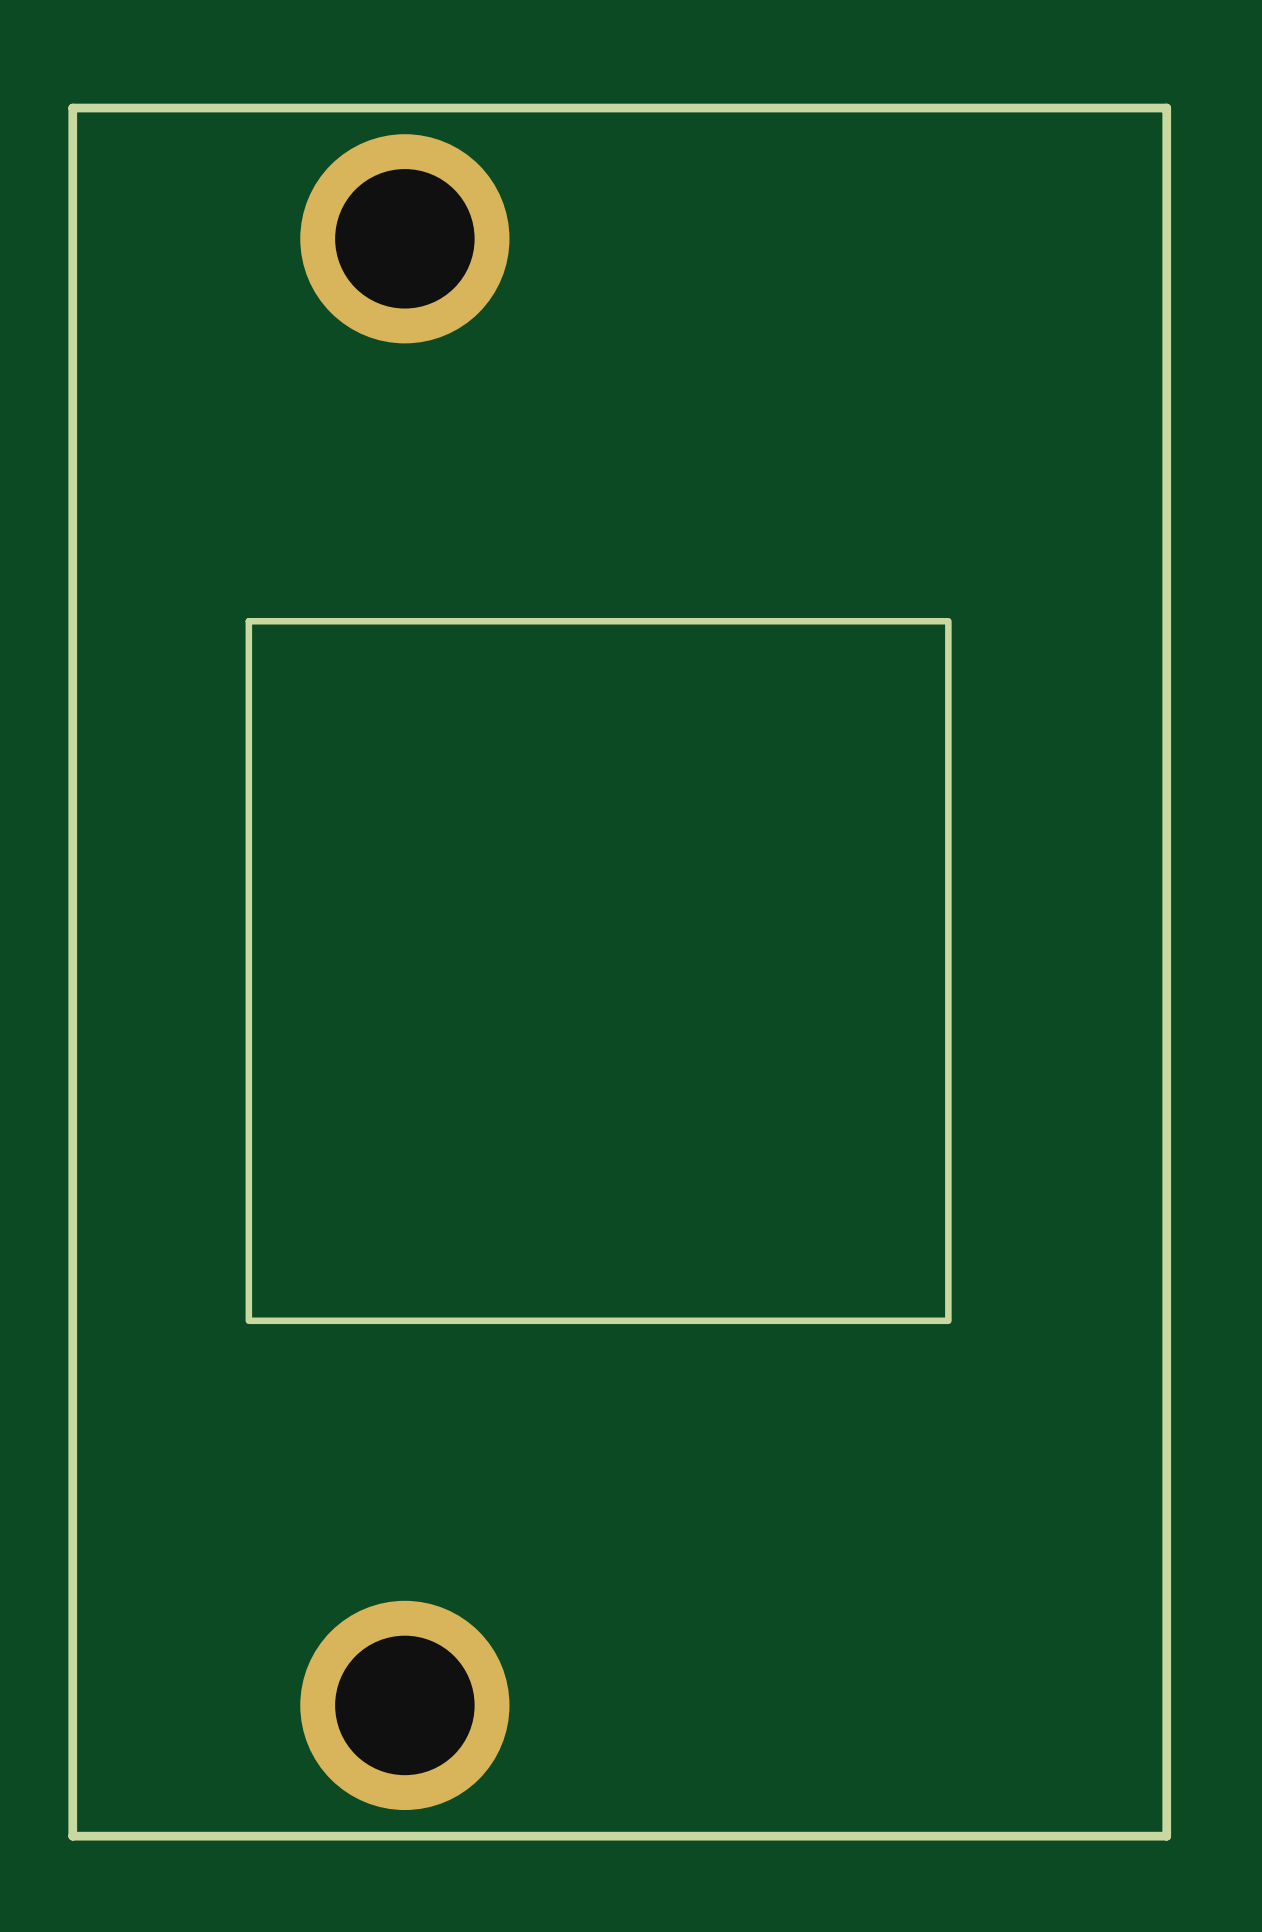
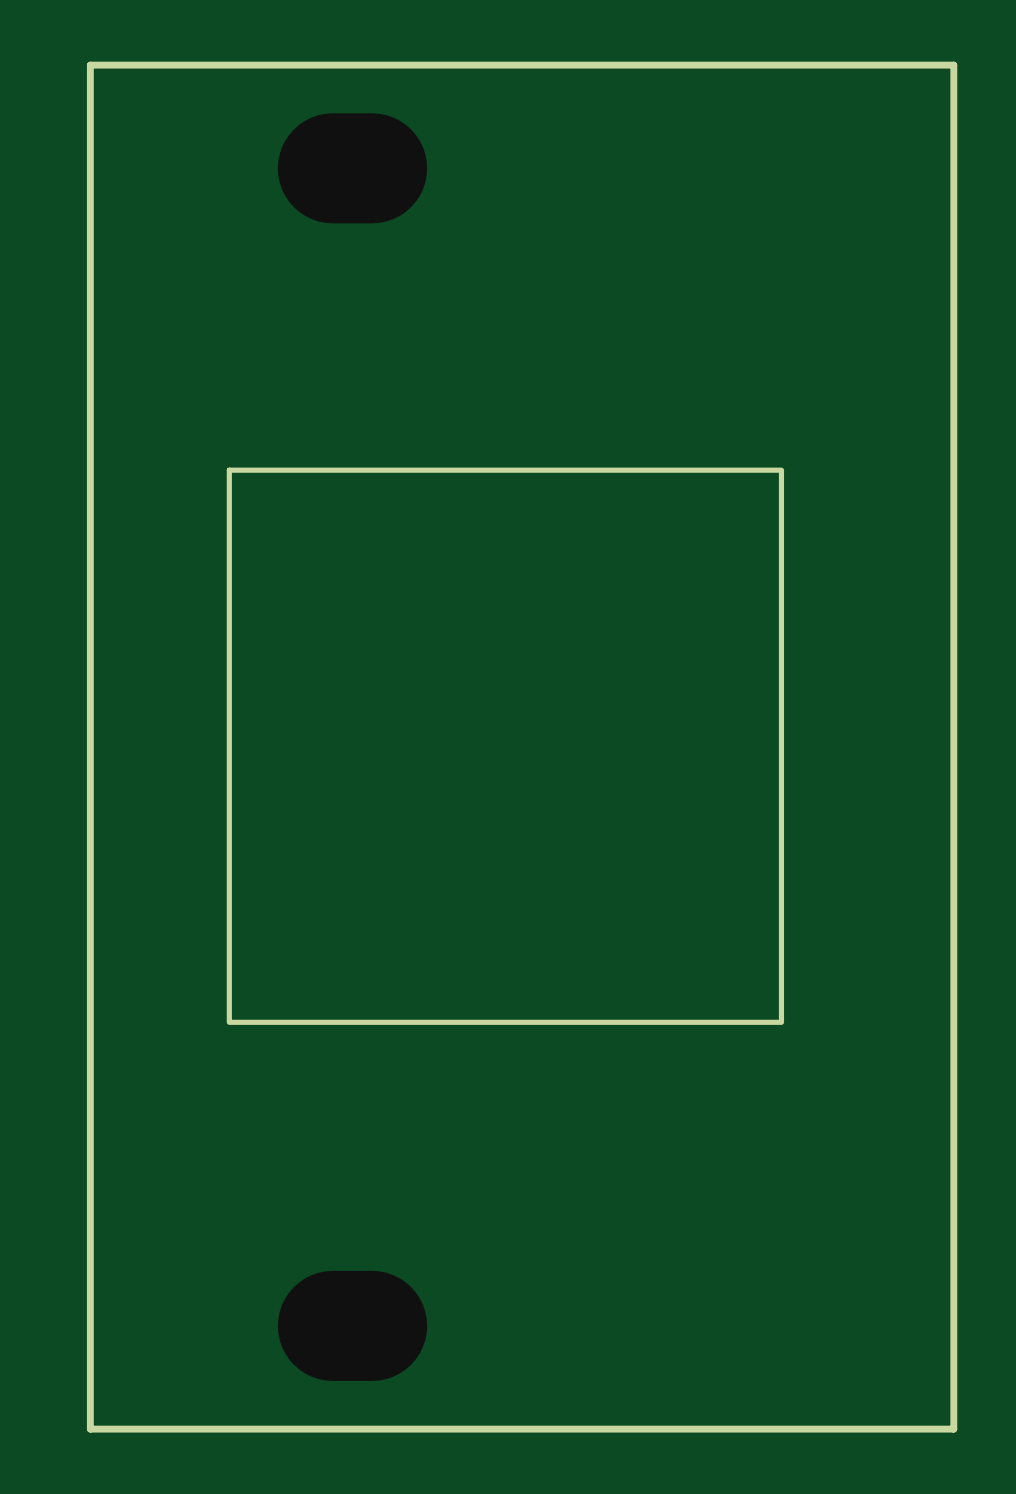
part footprint: [300, 134, 510, 344] -> [277, 113, 428, 224]
part footprint: [300, 1600, 510, 1811] -> [277, 1270, 428, 1381]

